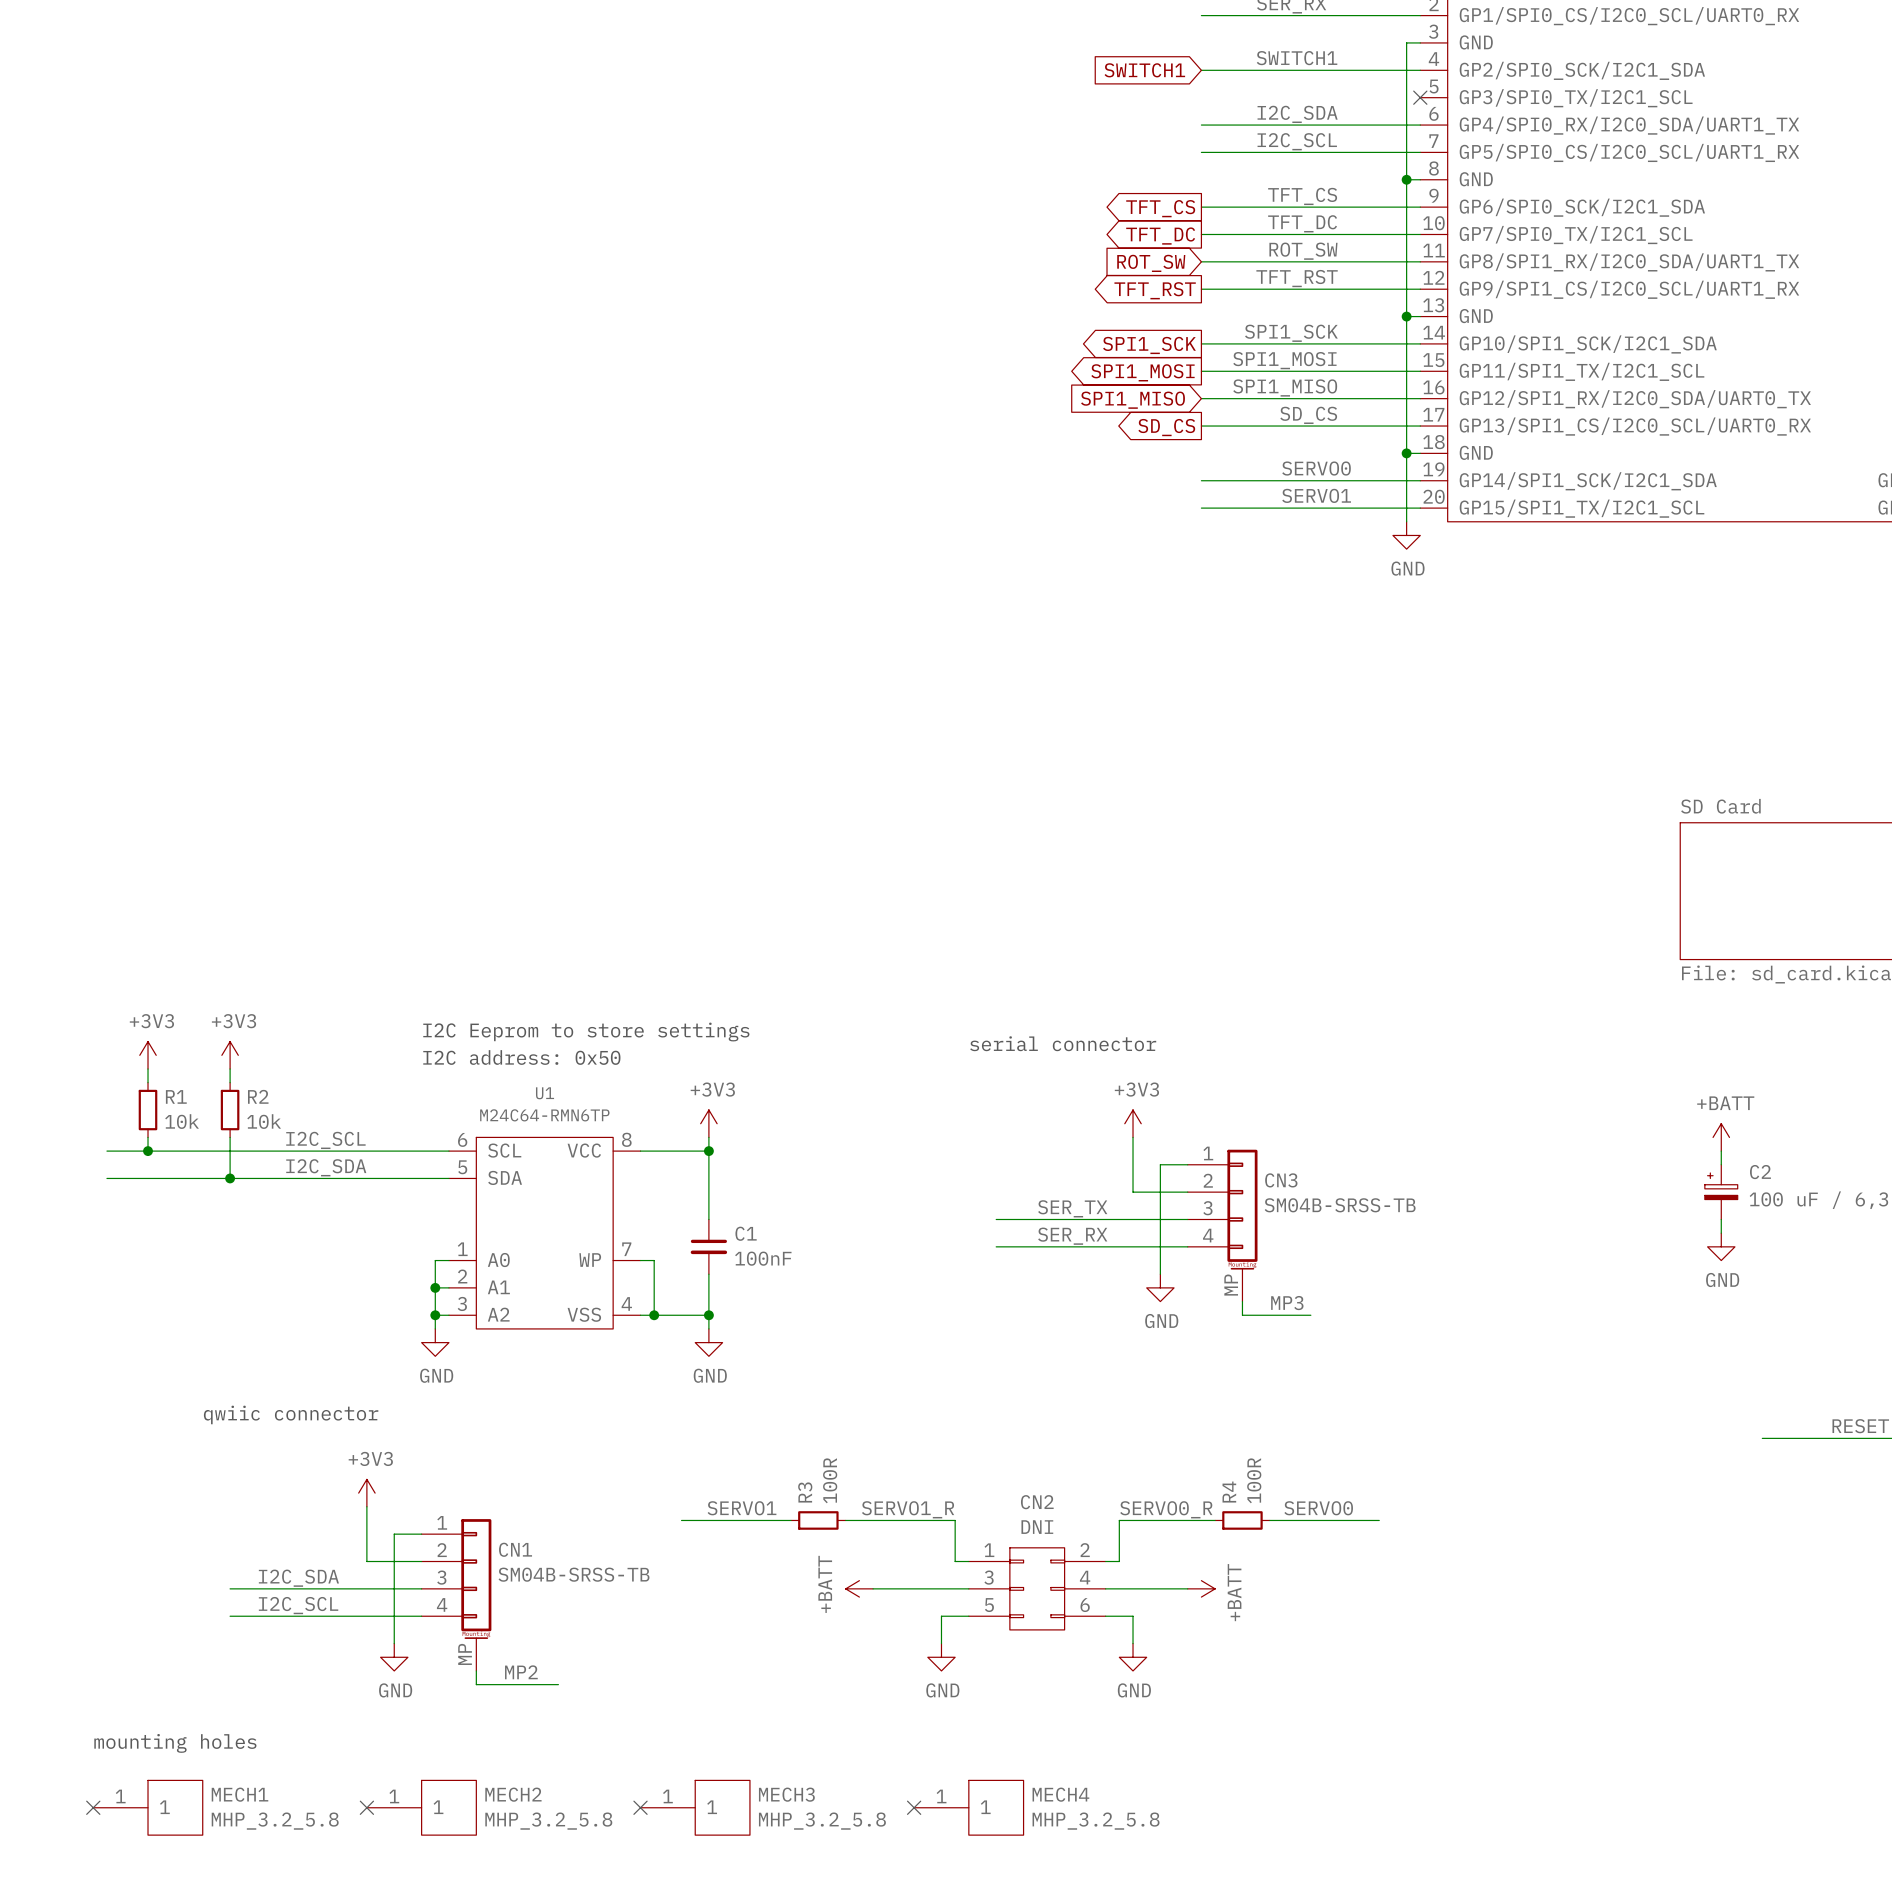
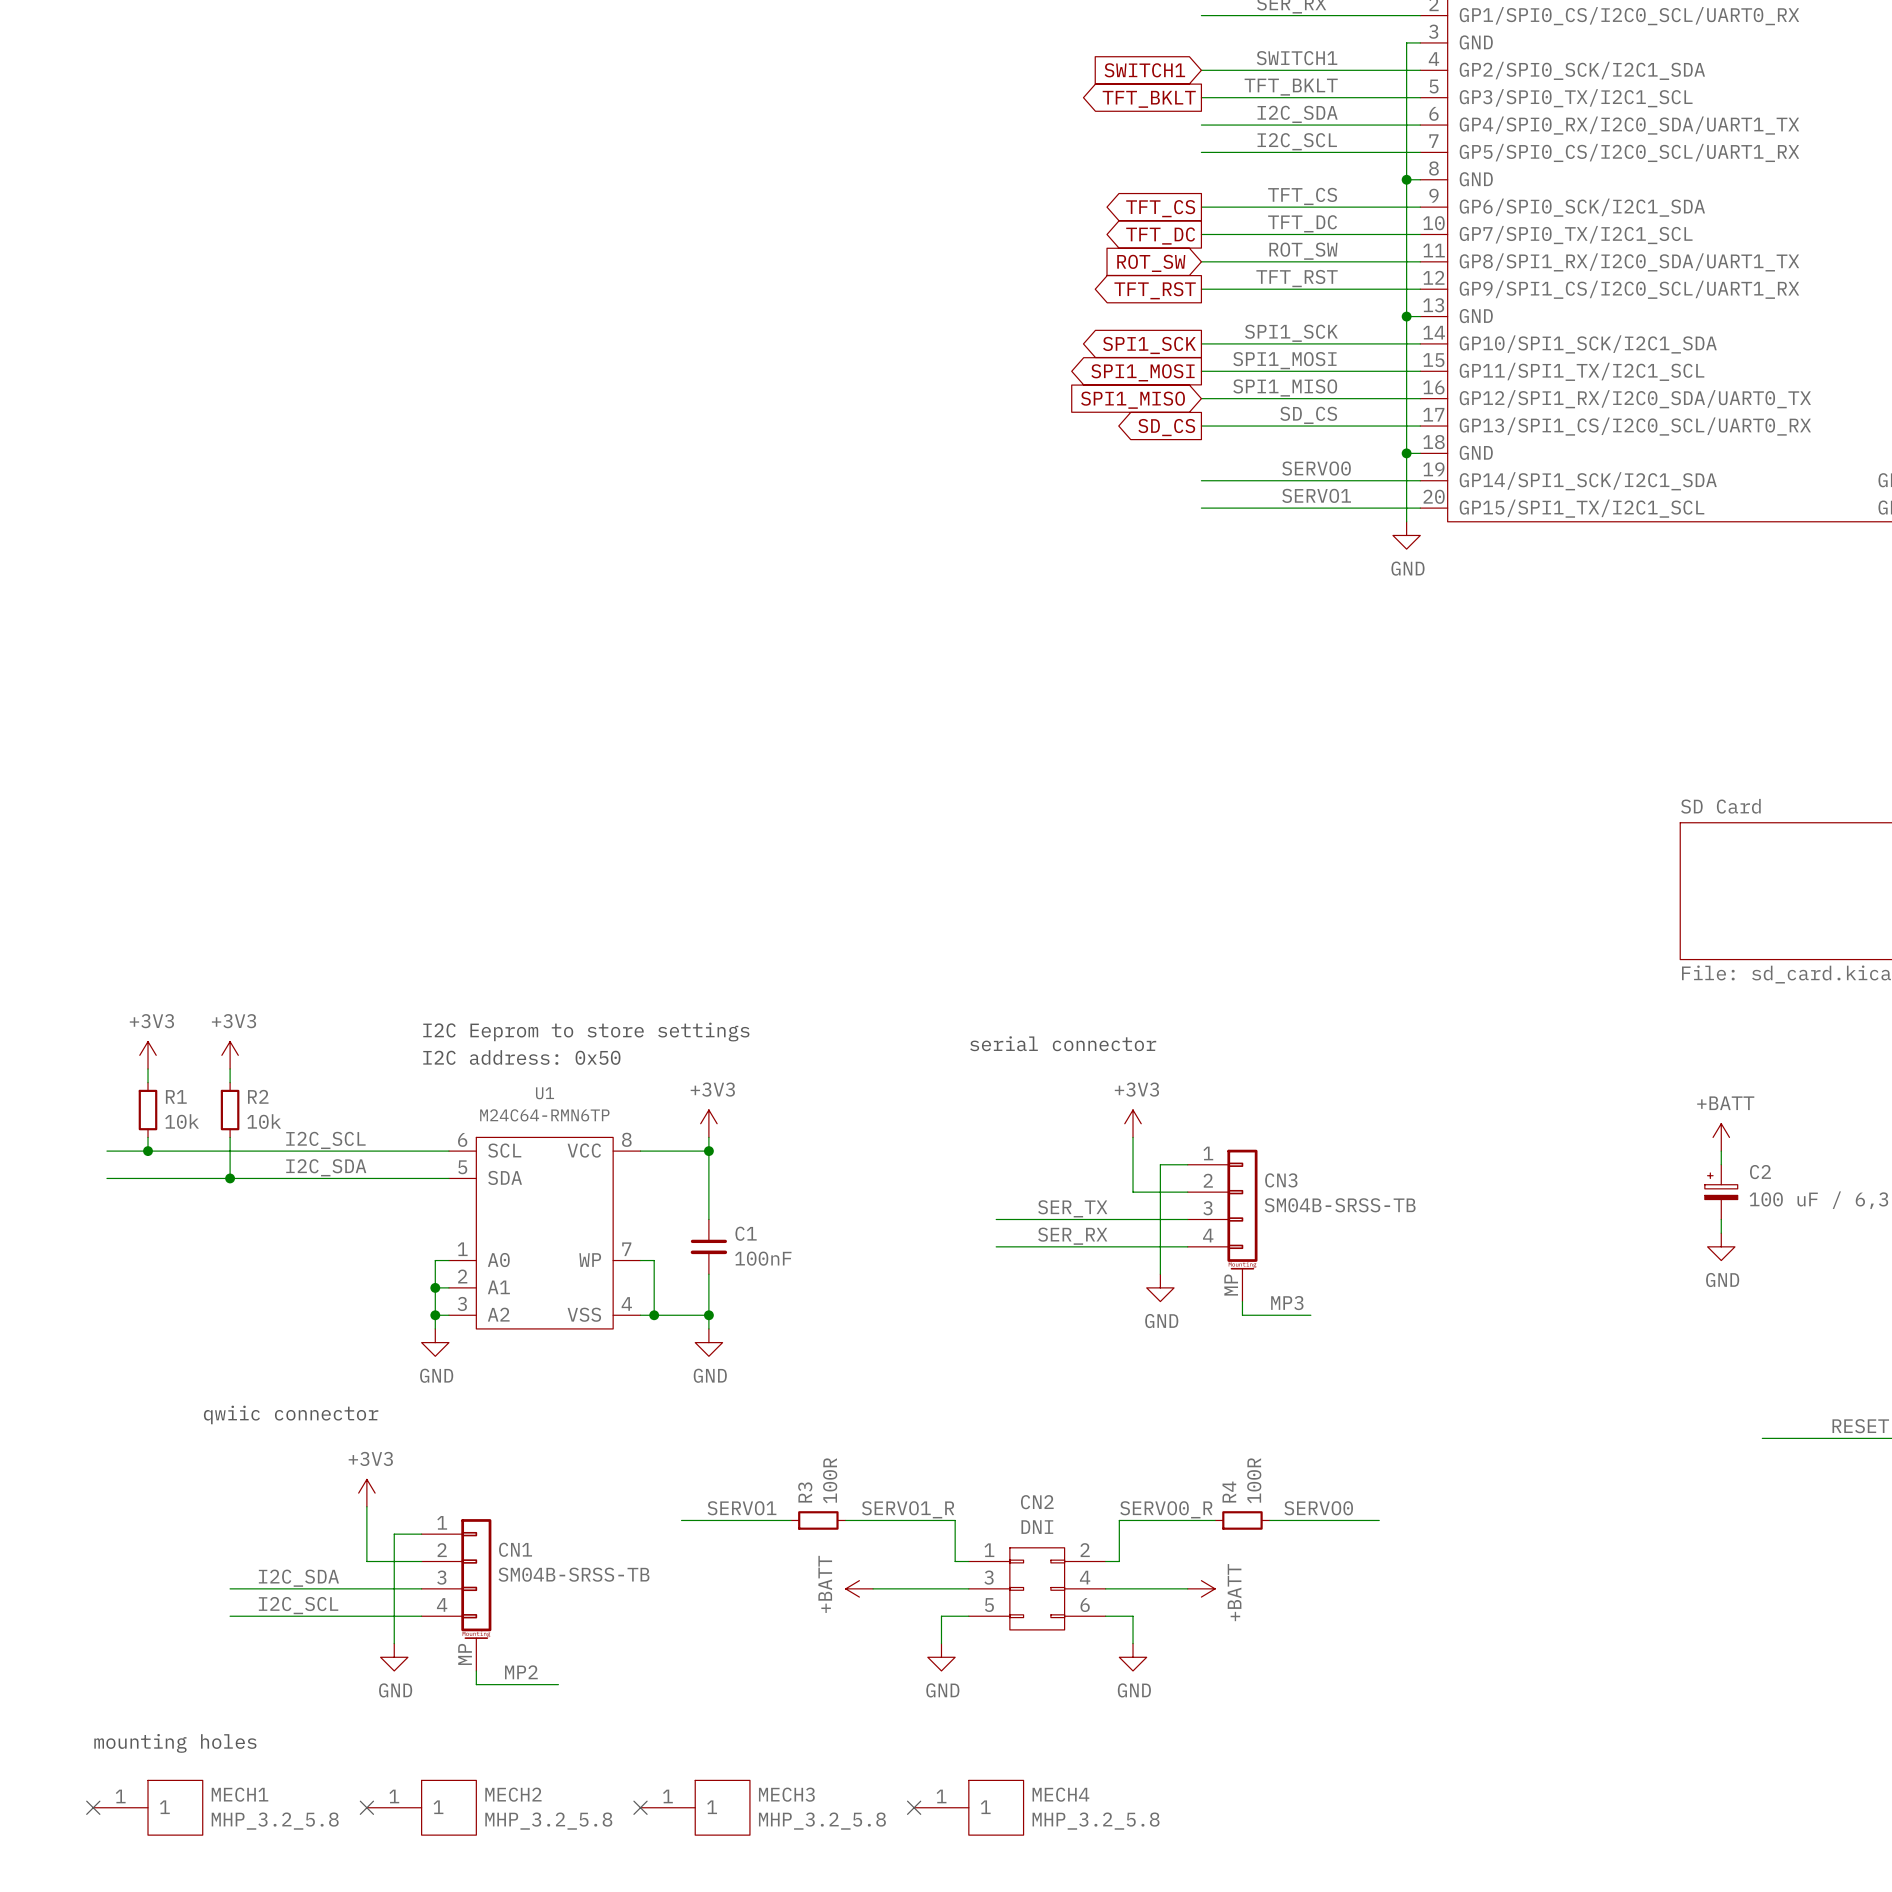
label: none -> TFT_BKLT (1291, 87)
wire: none -> (1201, 97) (1420, 97)
no-connect mark: (1420, 97) -> none
global label: none -> TFT_BKLT (1149, 99)

